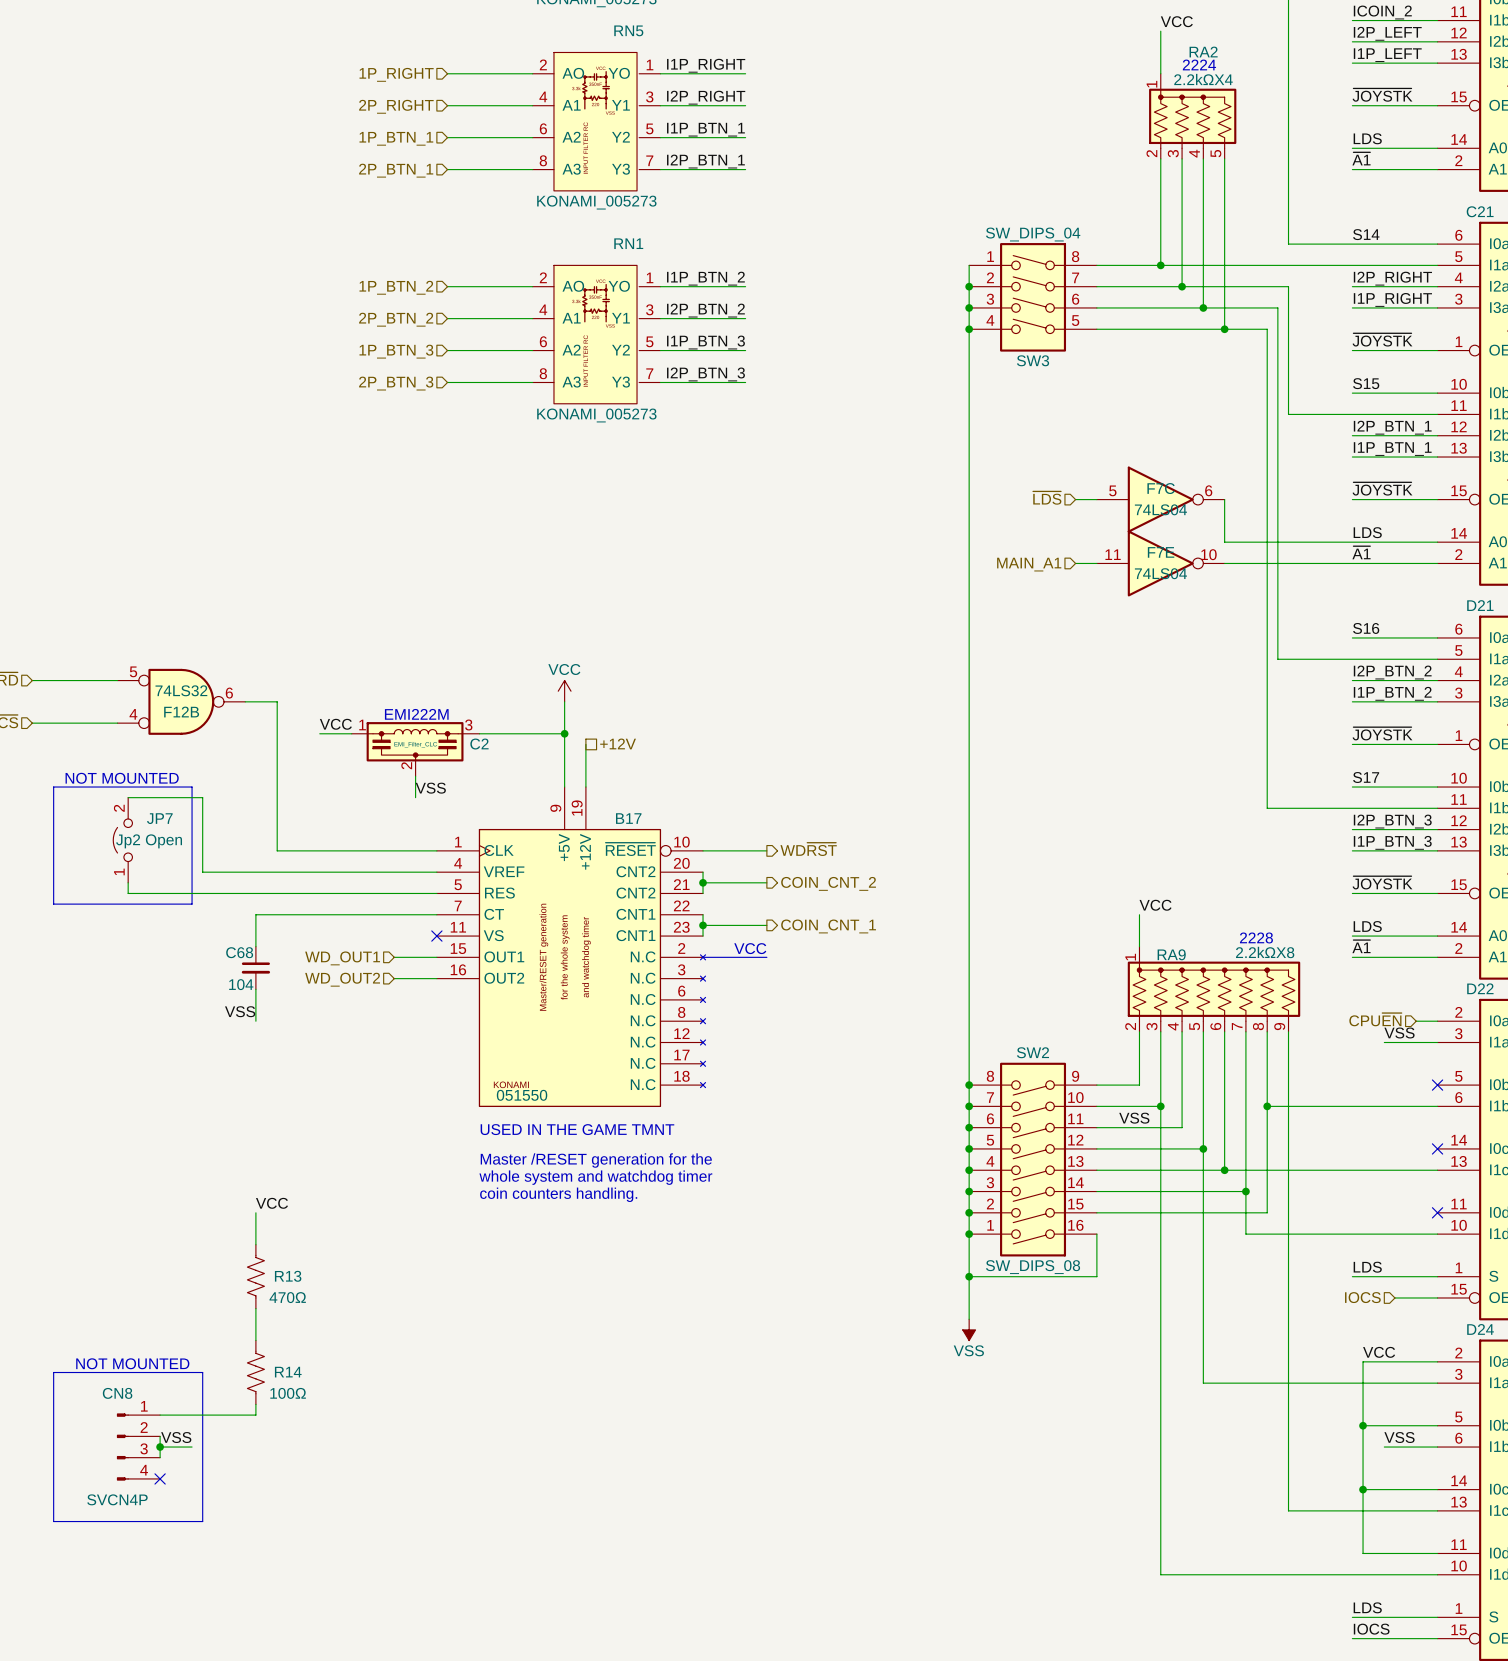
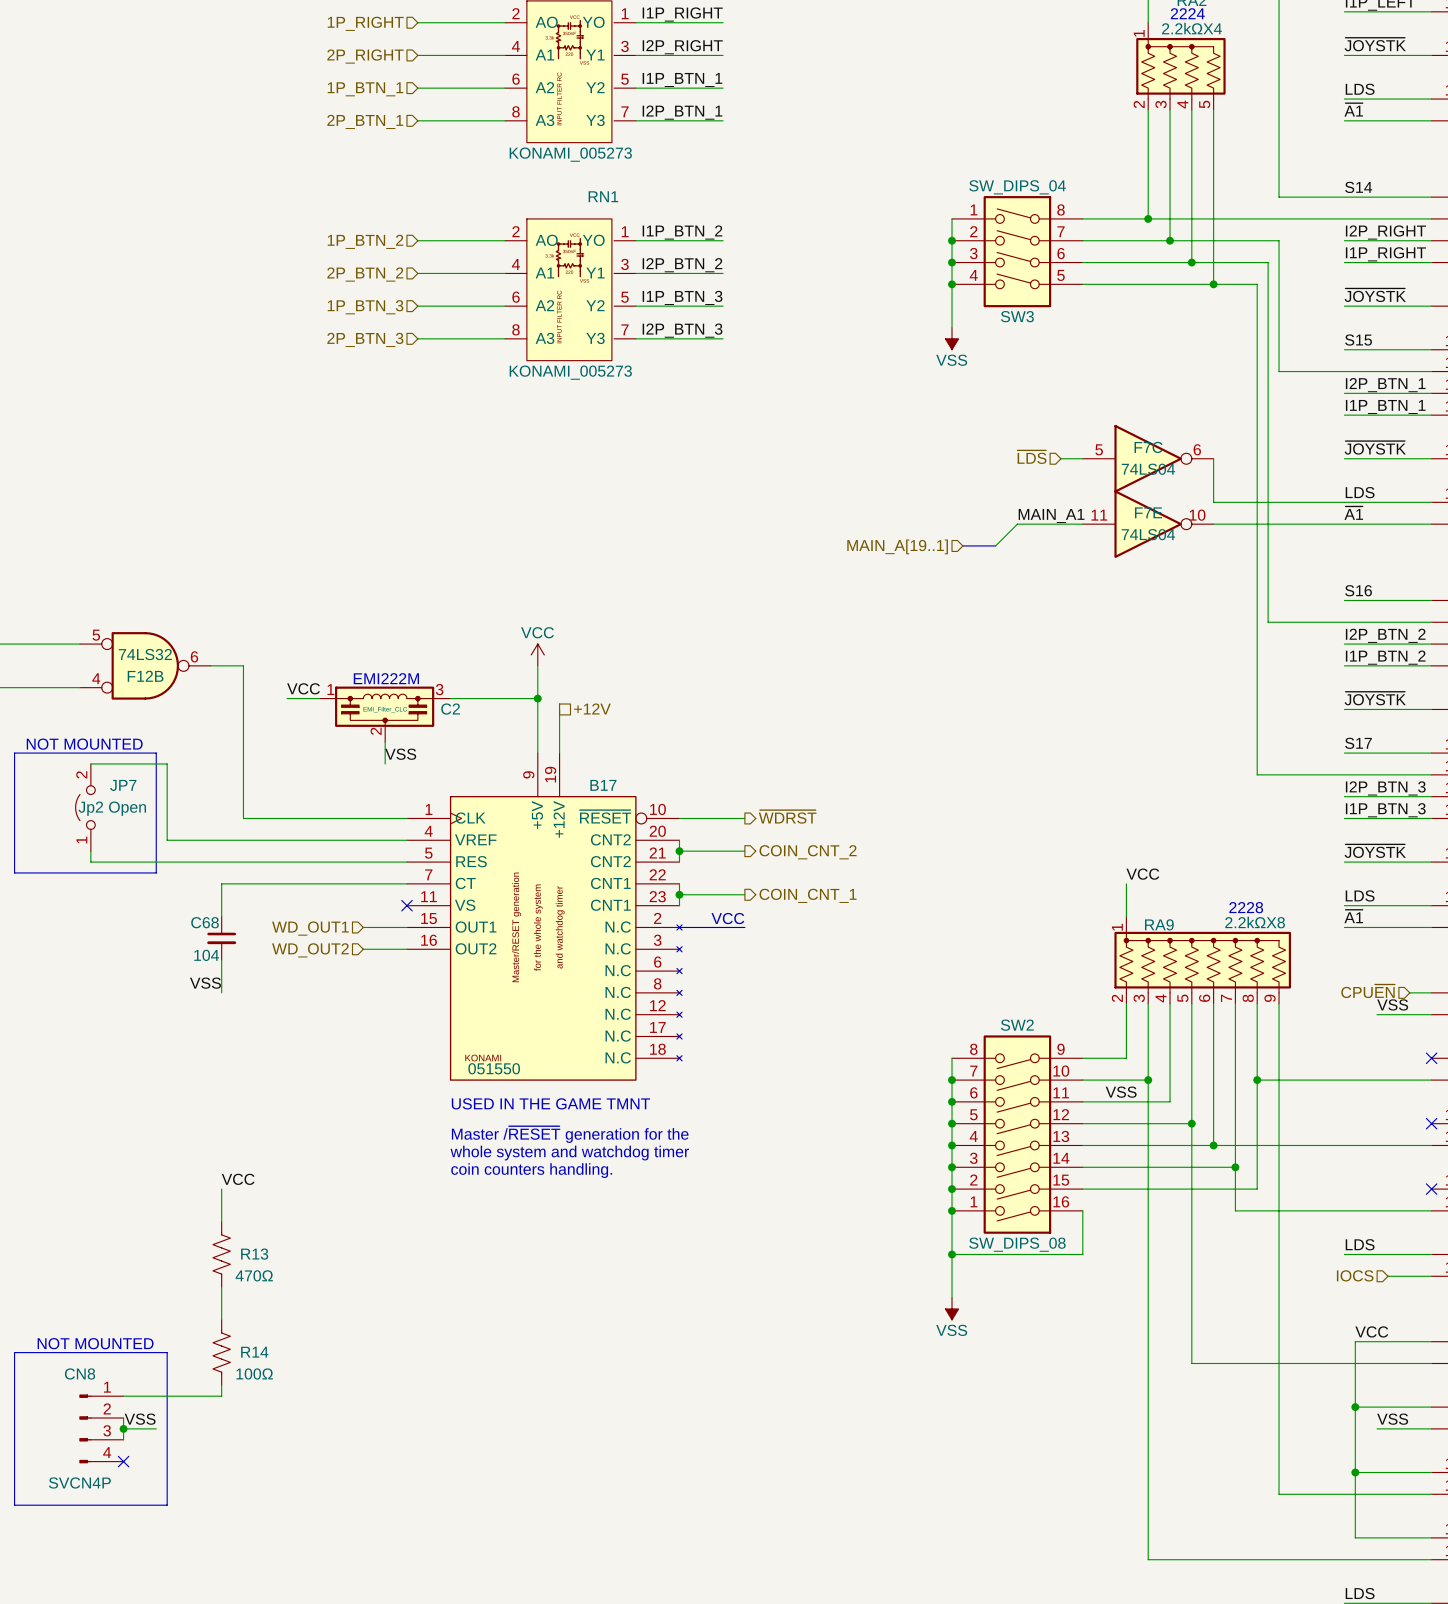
wire: (969, 371) (969, 1085) -> none
power symbol: none -> VSS (952, 338)
label: none -> MAIN_A1 (1051, 516)
wire: none -> (1061, 524) (1017, 524) (995, 545)
hierarchical label: MAIN_A1 (1029, 564) -> none
bus: none -> (962, 545) (995, 545)
hierarchical label: none -> MAIN_A[19..1] (897, 546)
hierarchical label: WD~{RST} (808, 849) -> ~{WDRST} (787, 816)
junction: (969, 1085) -> none
text: Master /RESET generation for the (596, 1160) -> Master /~{RESET} generation for the (570, 1134)

